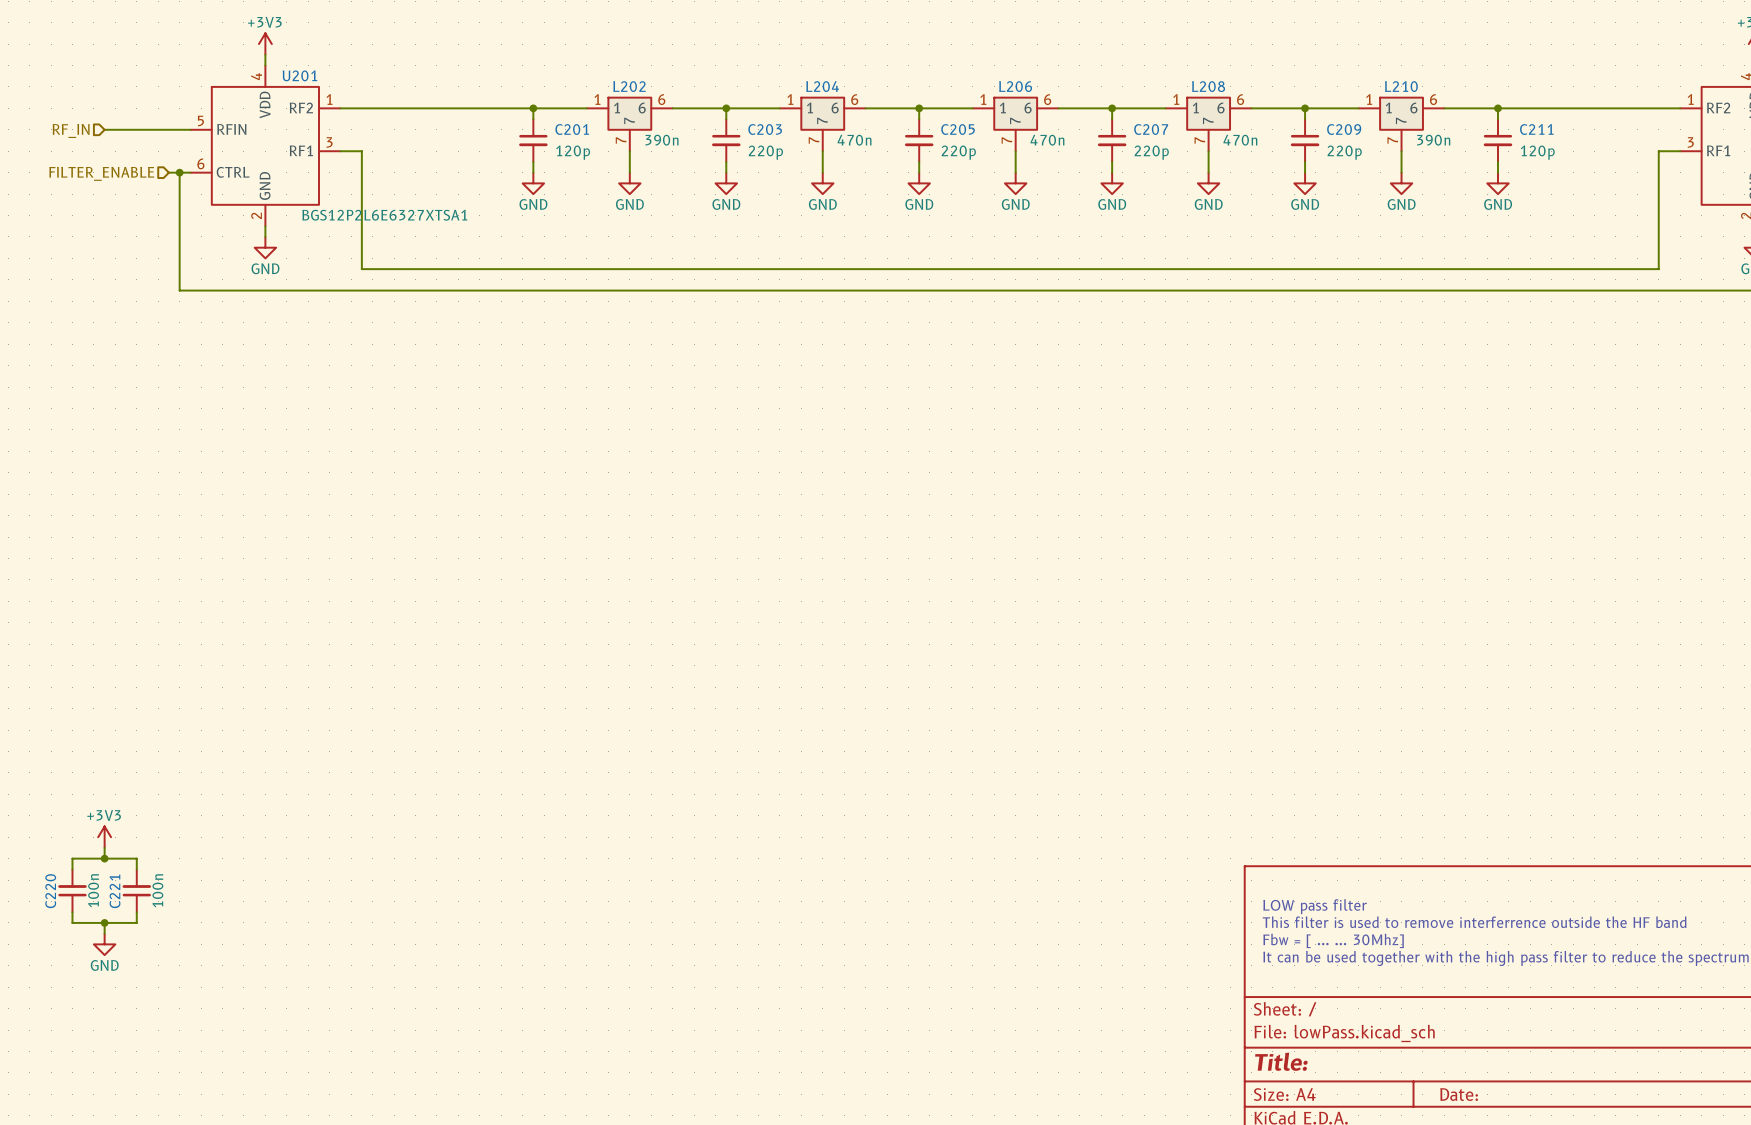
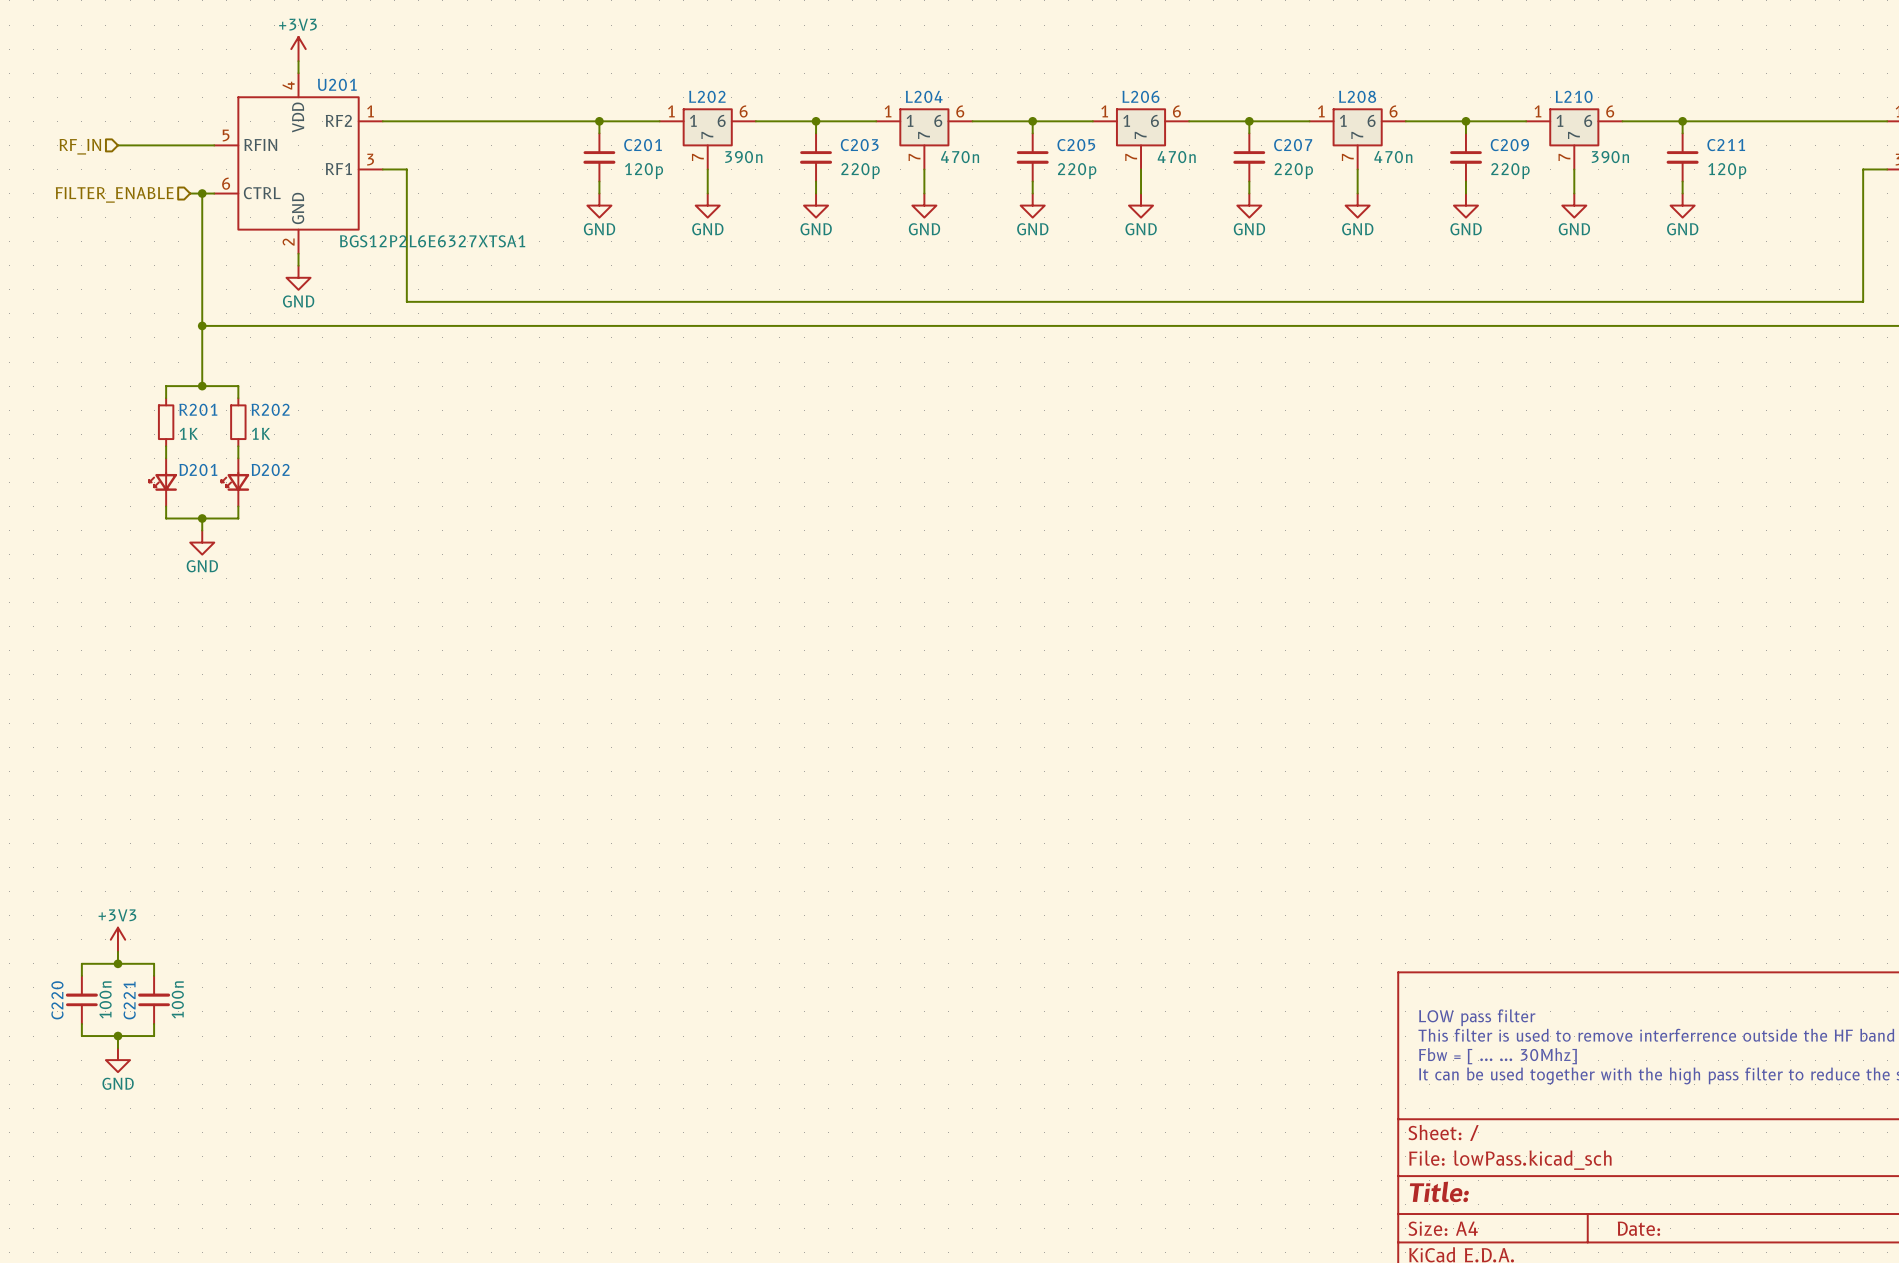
wire: none -> (202, 325) (202, 386)
junction: none -> (202, 325)
junction: none -> (202, 386)
wire: none -> (166, 398) (166, 386) (238, 386) (238, 398)
R201: none -> 1K (166, 422)
R202: none -> 1K (238, 422)
wire: none -> (166, 446) (166, 458)
wire: none -> (238, 446) (238, 458)
D201: none -> (163, 482)
D202: none -> (235, 482)
wire: none -> (166, 506) (166, 518) (238, 518) (238, 506)
wire: none -> (202, 518) (202, 530)
junction: none -> (202, 518)
power symbol: none -> GND (202, 542)

